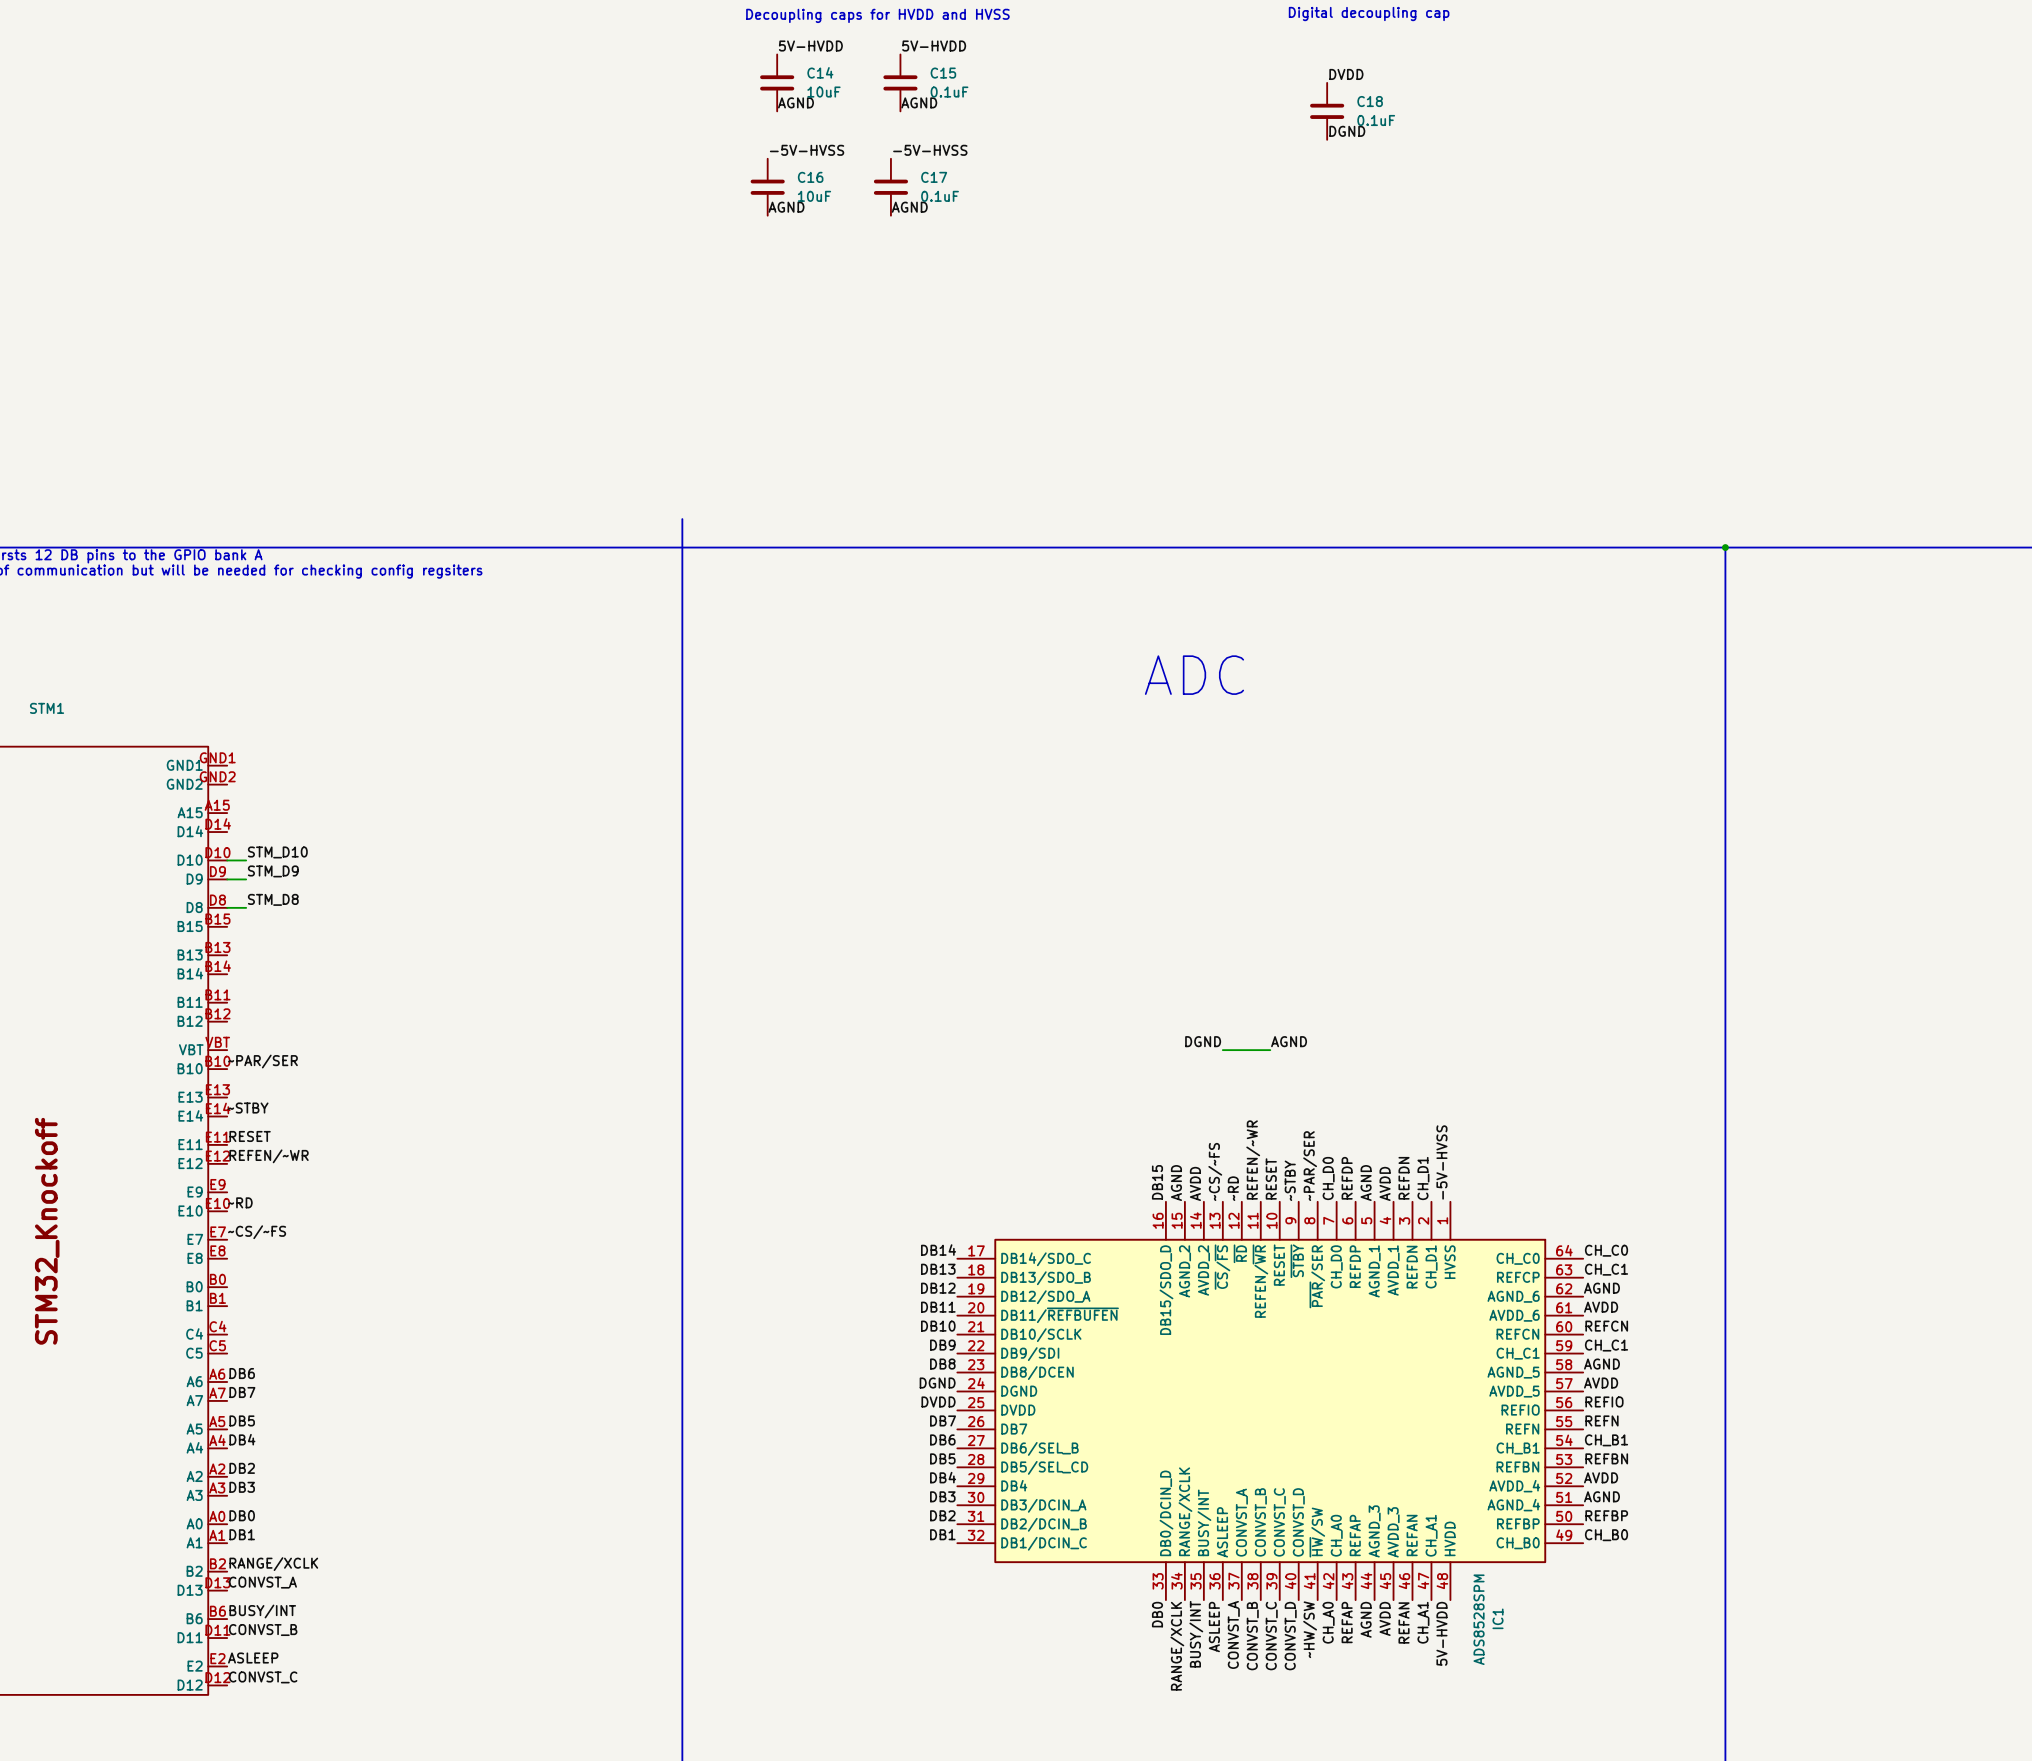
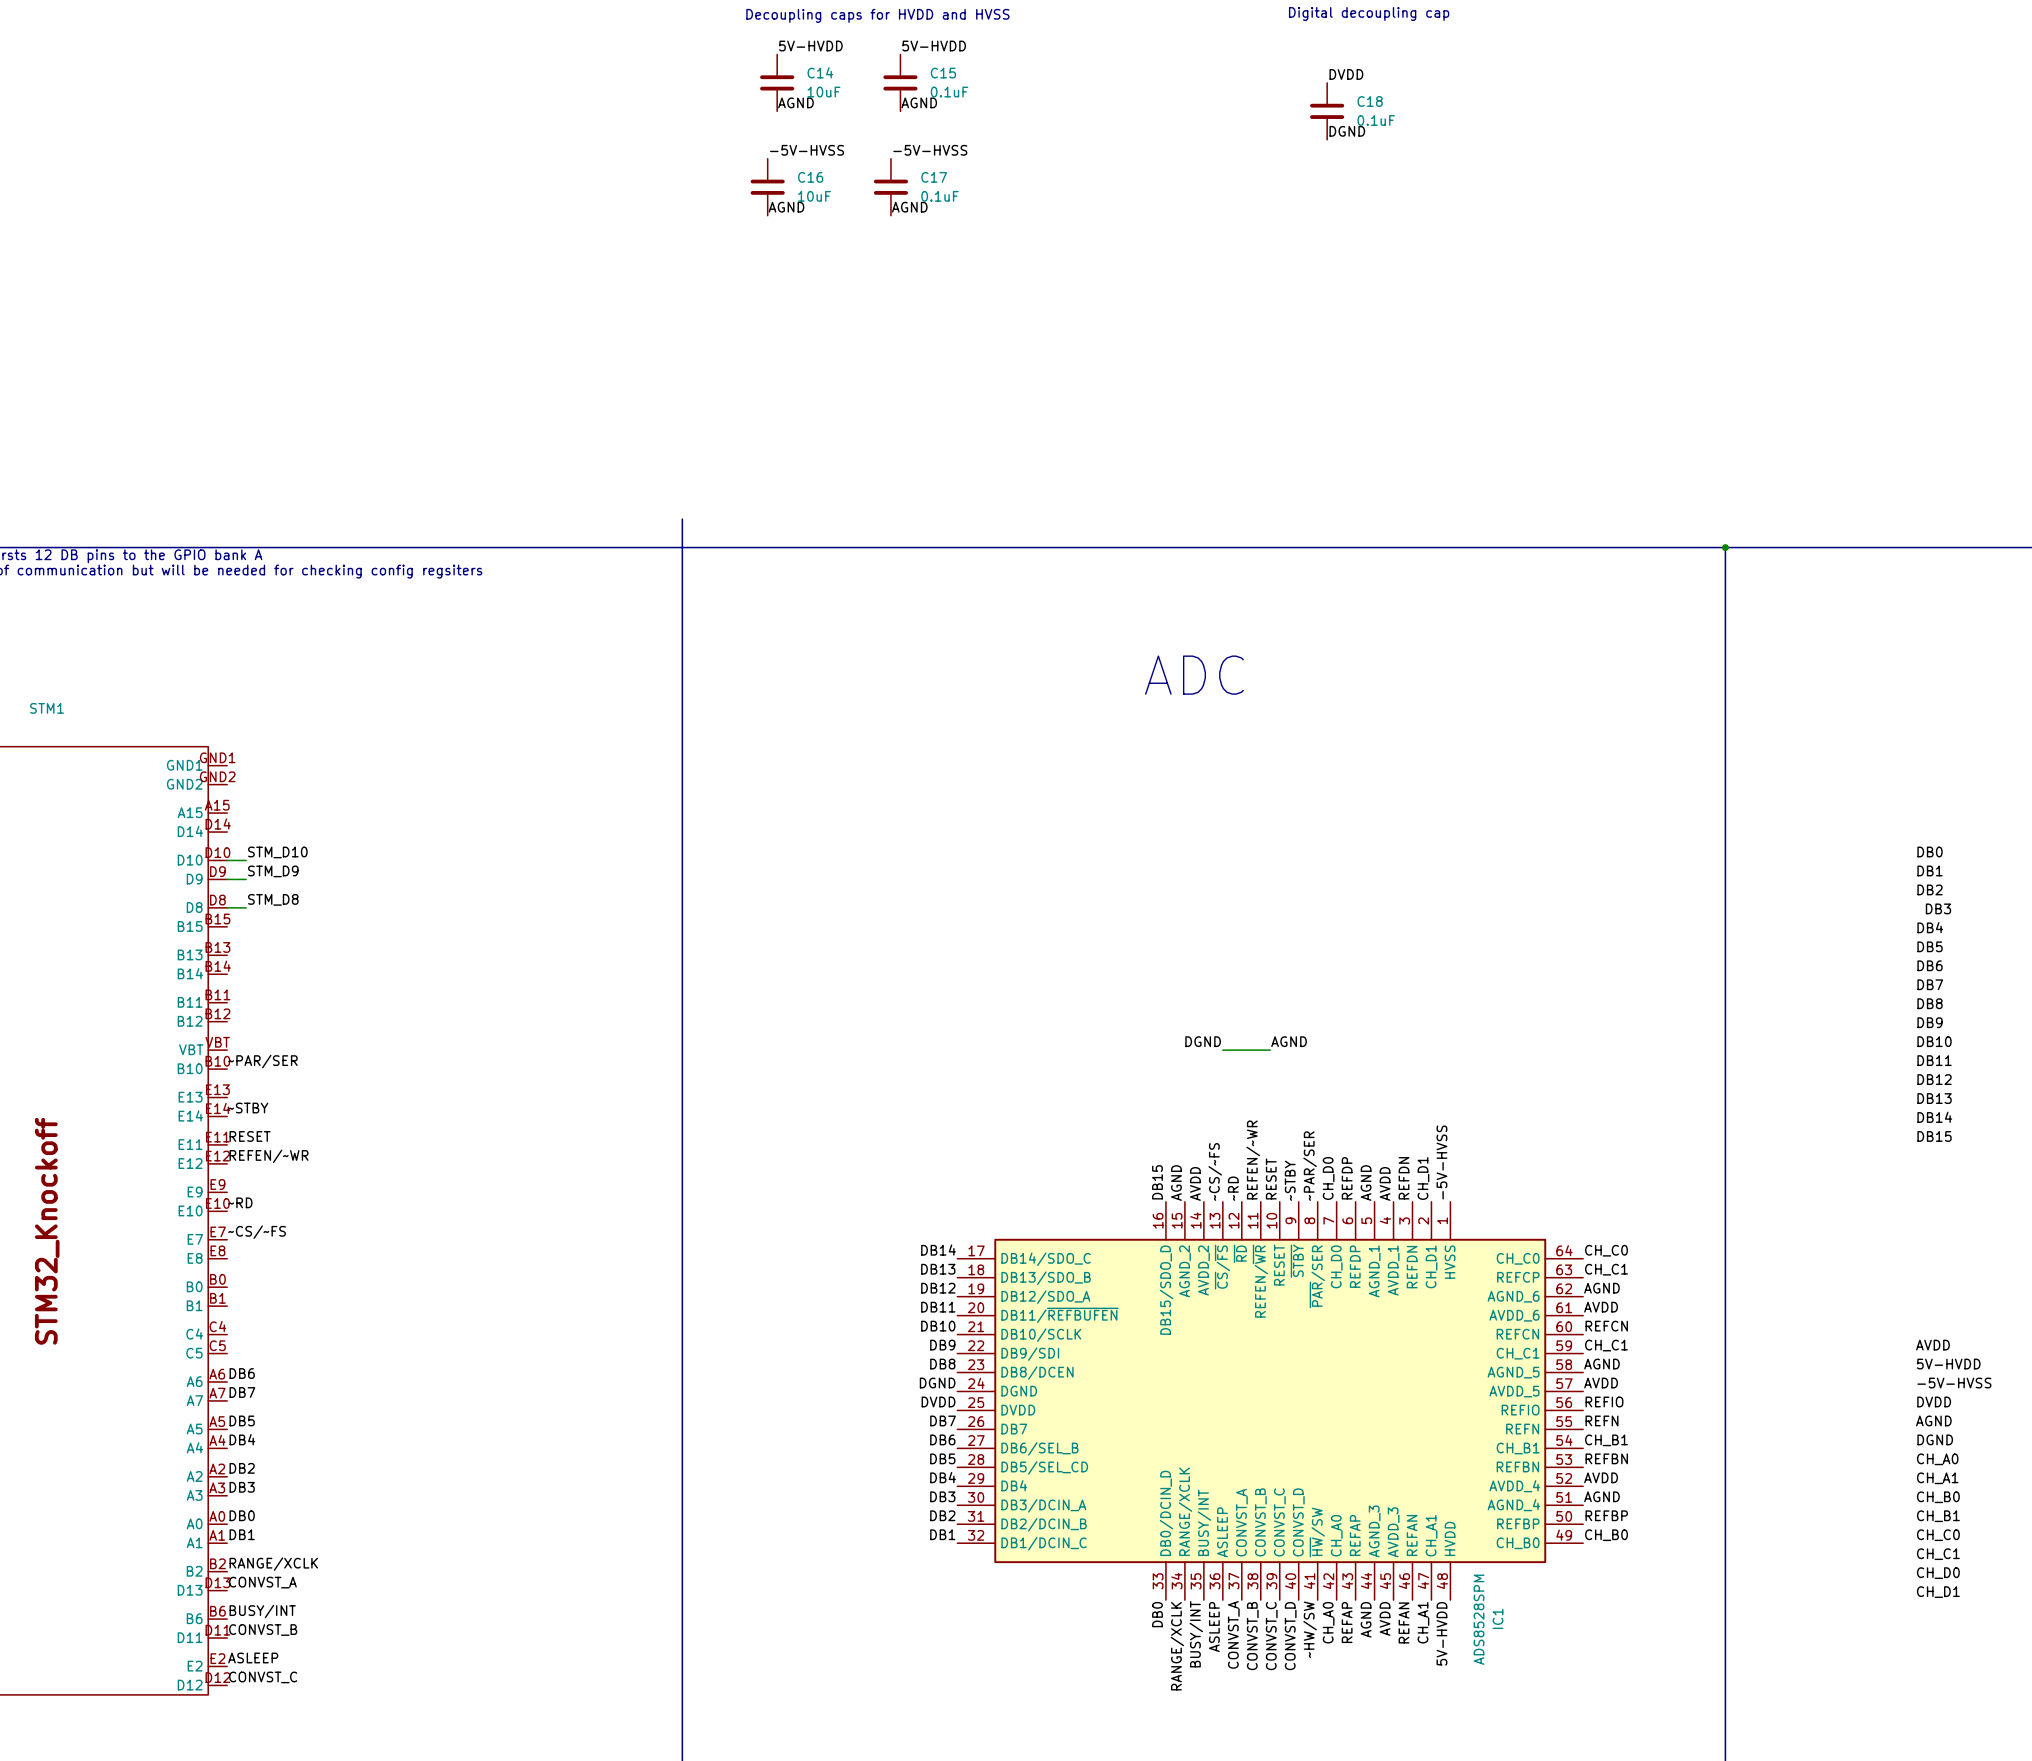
label: none -> DB0 (1930, 852)
label: none -> DB1 (1930, 870)
label: none -> DB2 (1930, 889)
label: none -> DB3 (1938, 908)
label: none -> DB4 (1930, 927)
label: none -> DB5 (1930, 946)
label: none -> DB6 (1930, 965)
label: none -> DB7 (1930, 984)
label: none -> DB8 (1930, 1003)
label: none -> DB9 (1930, 1022)
label: none -> DB10 (1934, 1041)
label: none -> DB11 (1934, 1060)
label: none -> DB12 (1934, 1079)
label: none -> DB13 (1934, 1098)
label: none -> DB14 (1934, 1117)
label: none -> DB15 (1934, 1136)
label: none -> AVDD (1932, 1345)
label: none -> 5V-HVDD (1948, 1364)
label: none -> -5V-HVSS (1954, 1383)
label: none -> DVDD (1934, 1401)
label: none -> AGND (1933, 1420)
label: none -> DGND (1935, 1439)
label: none -> CH_A0 (1937, 1459)
label: none -> CH_A1 (1937, 1478)
label: none -> CH_B0 (1938, 1497)
label: none -> CH_B1 (1938, 1516)
label: none -> CH_C0 (1938, 1535)
label: none -> CH_C1 (1938, 1554)
label: none -> CH_D0 (1938, 1573)
label: none -> CH_D1 (1938, 1592)

